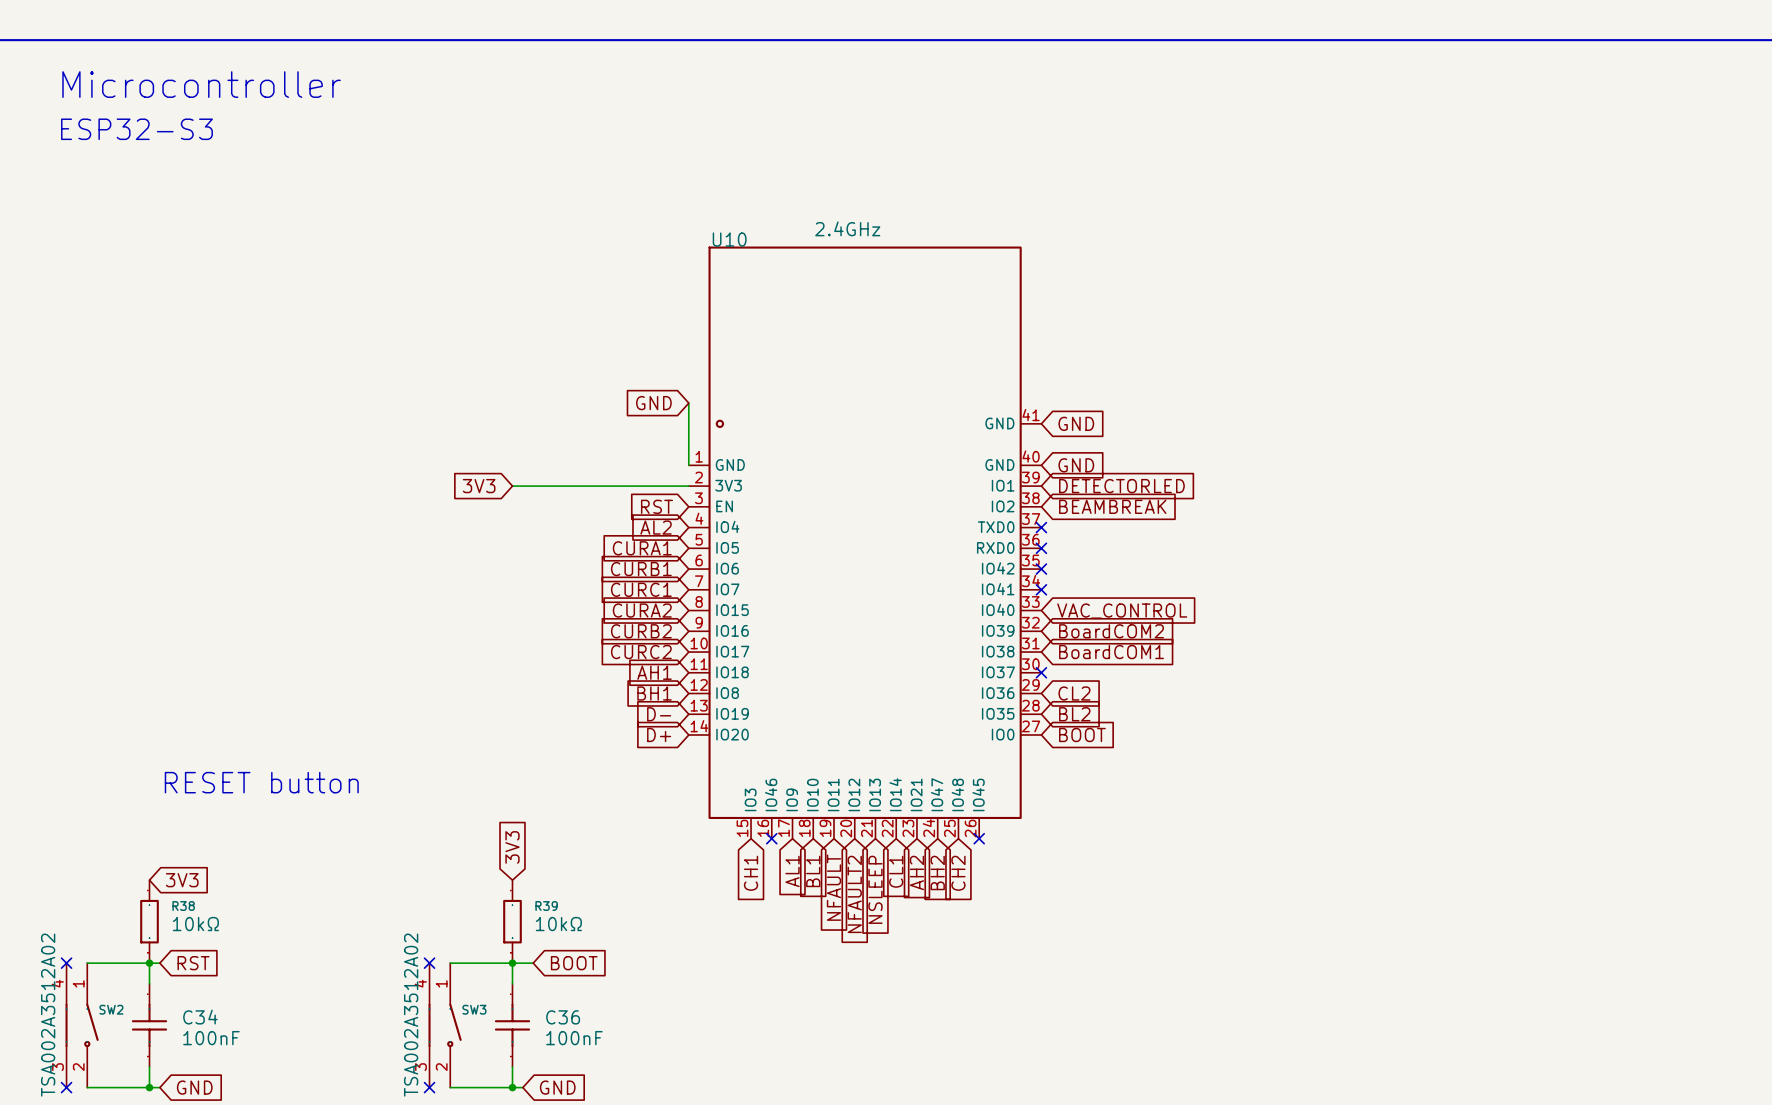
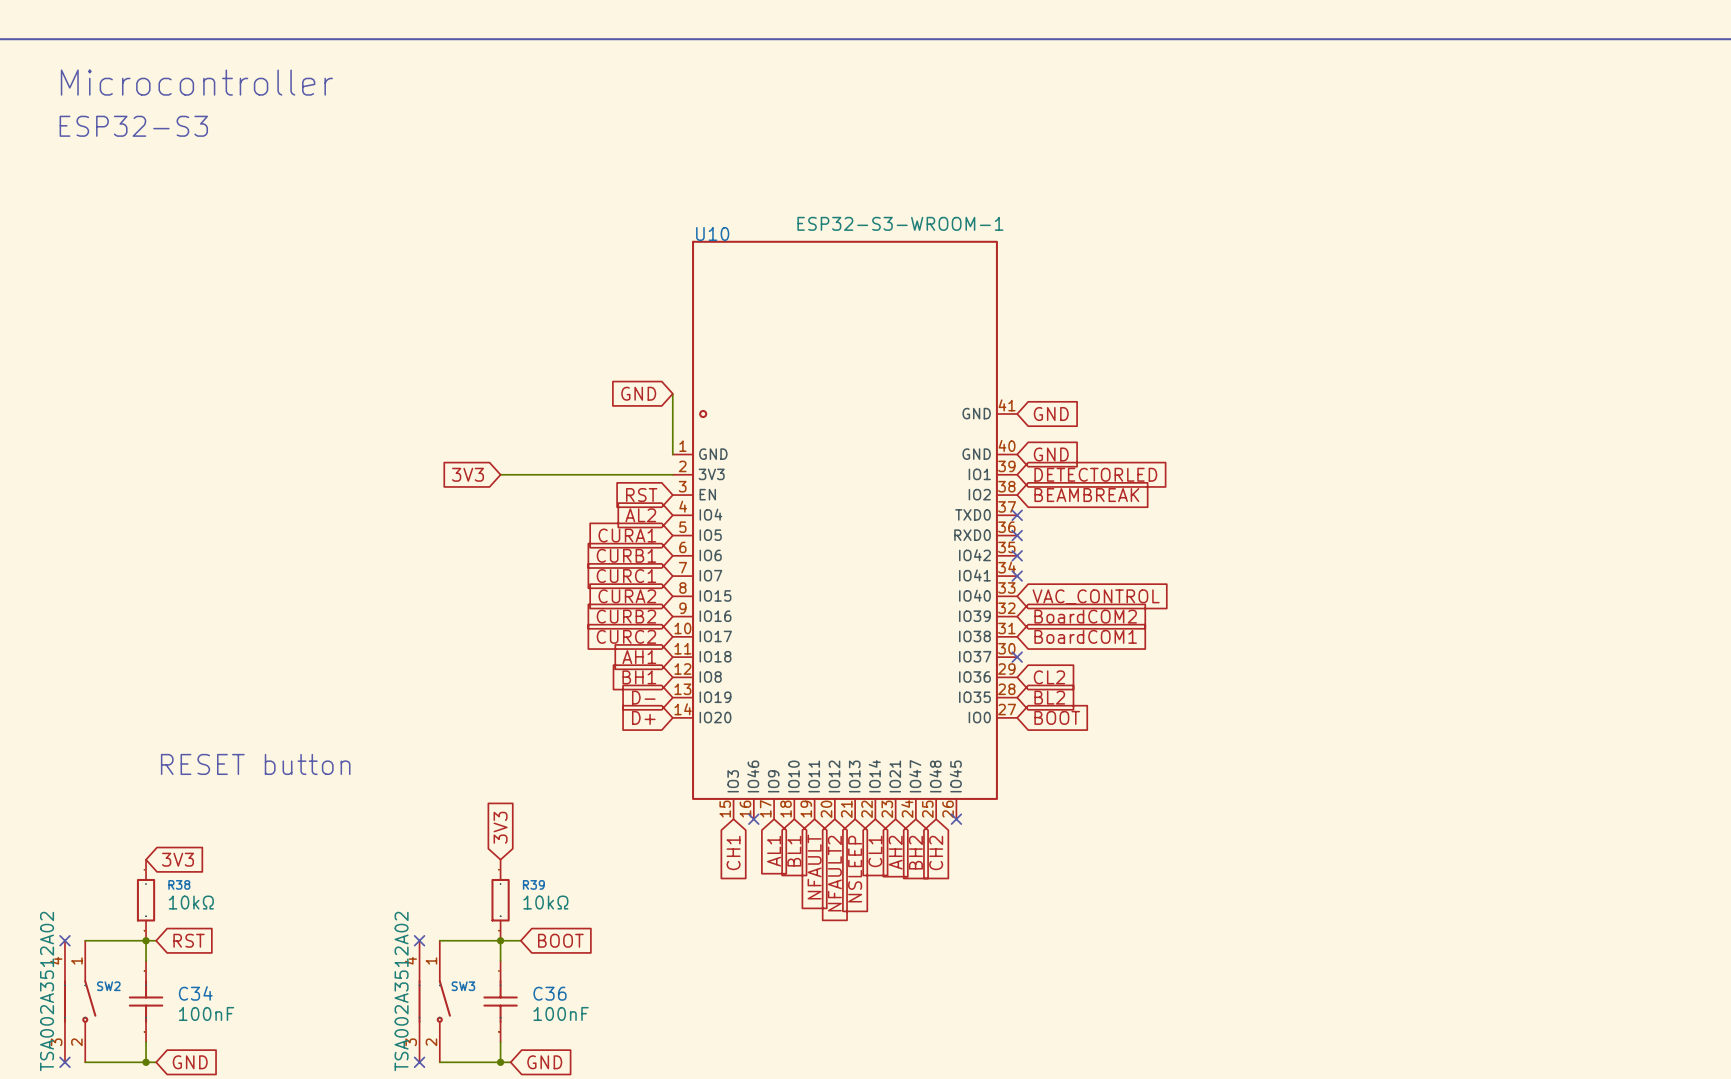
U10 value: 2.4GHz (847, 228) -> ESP32-S3-WROOM-1 (900, 223)

